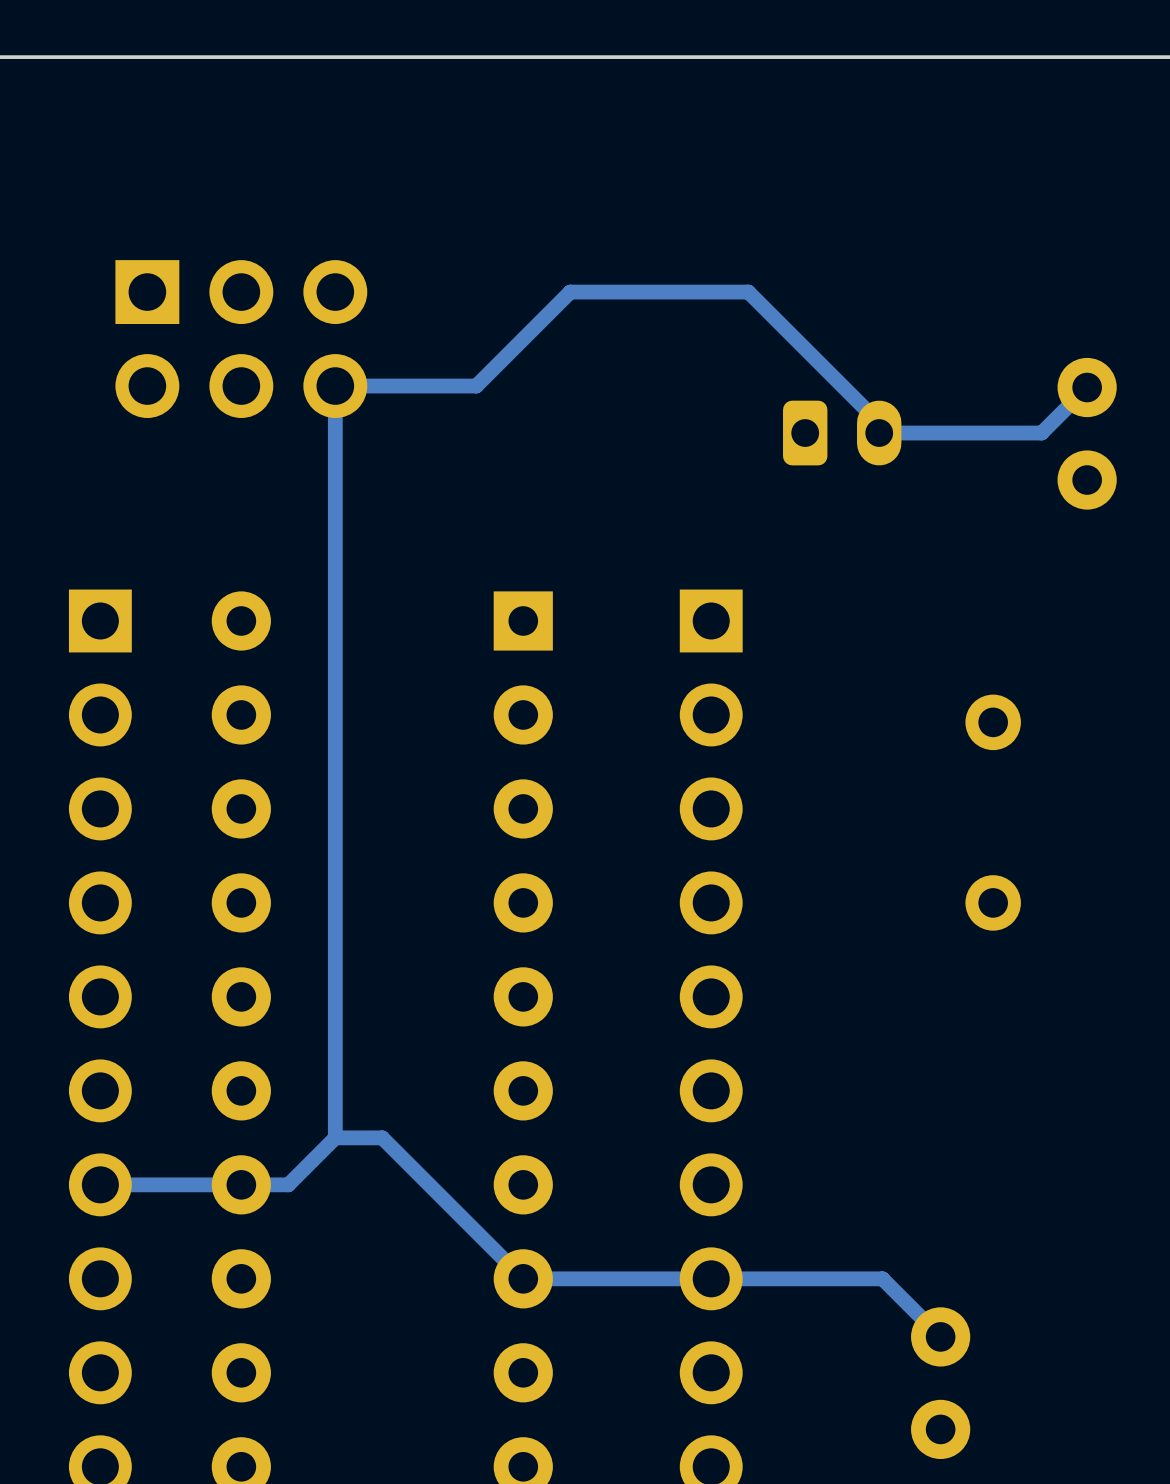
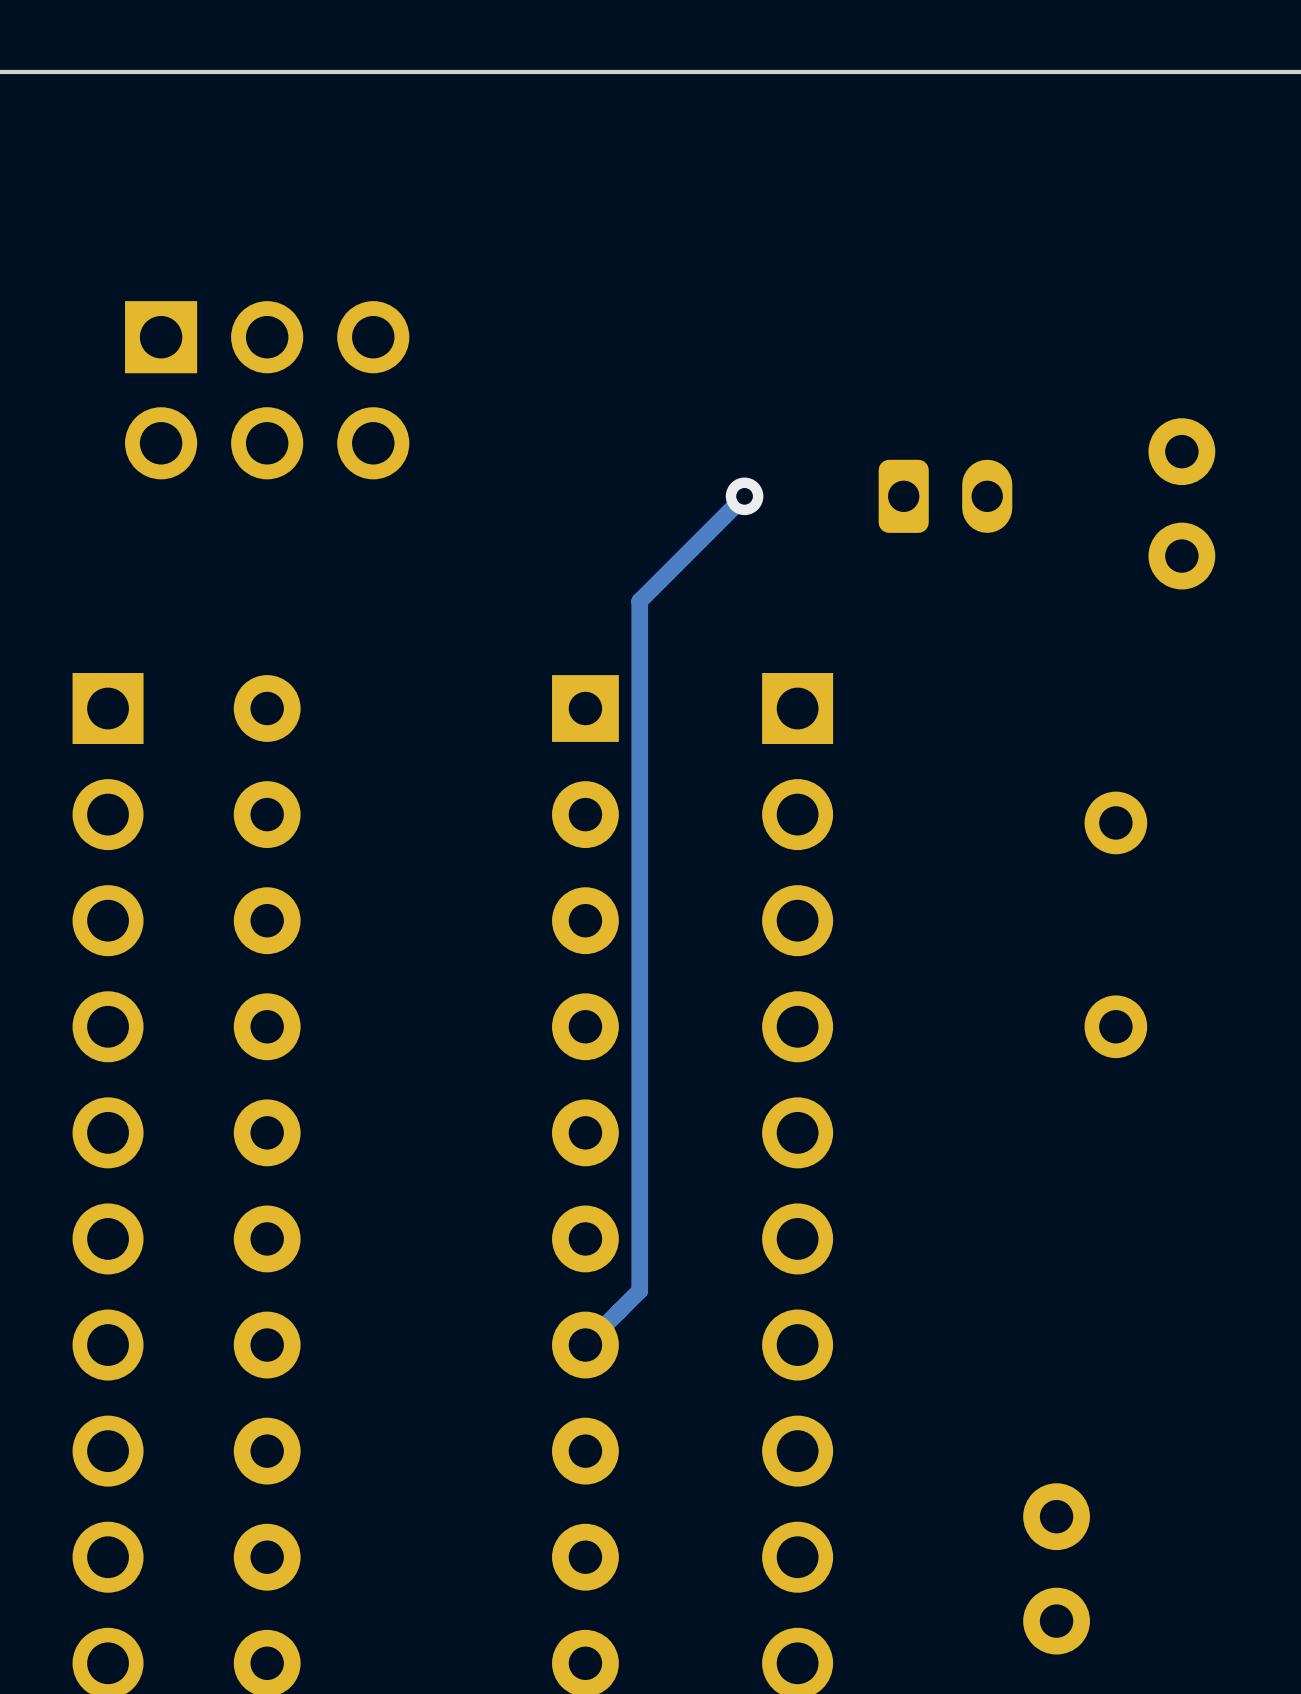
track: (1087, 387) (1041, 433) (879, 433) (879, 422) (748, 292) (570, 292) (476, 386) (335, 386) (335, 1137) -> none
track: none -> (744, 496) (639, 601) (639, 1290) (585, 1345)
via: none -> (744, 496)
part position: (1087, 433) -> (1181, 503)
track: (335, 1137) (288, 1184) (100, 1184) -> none
track: (335, 1137) (382, 1137) (523, 1278) (882, 1278) (940, 1336) -> none

